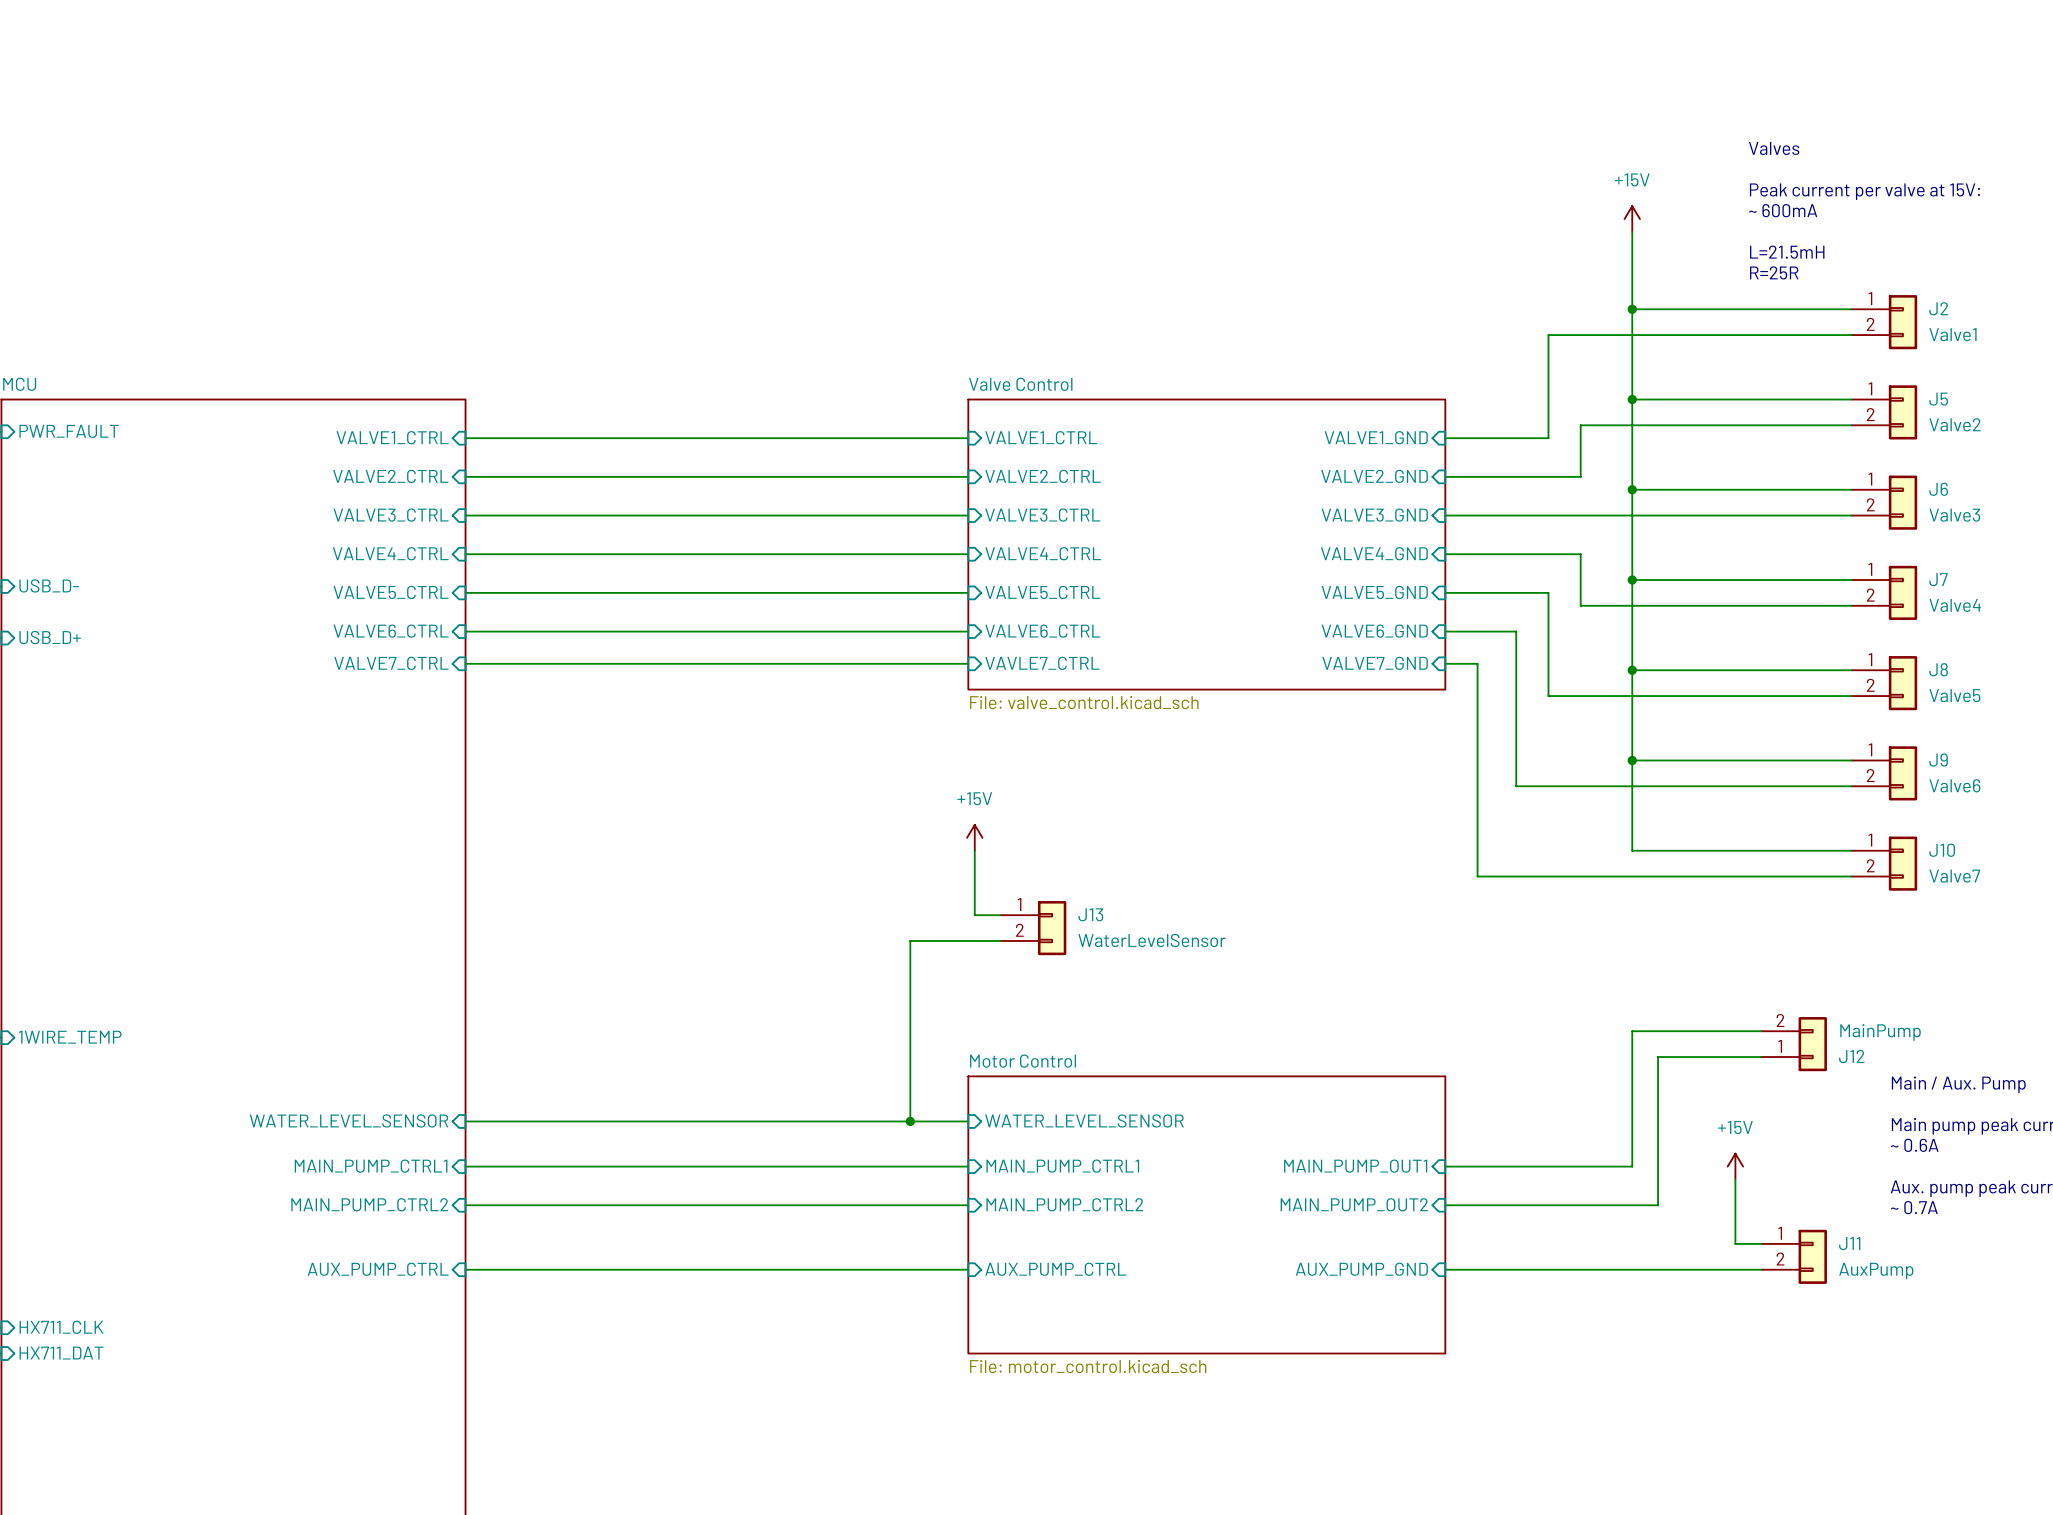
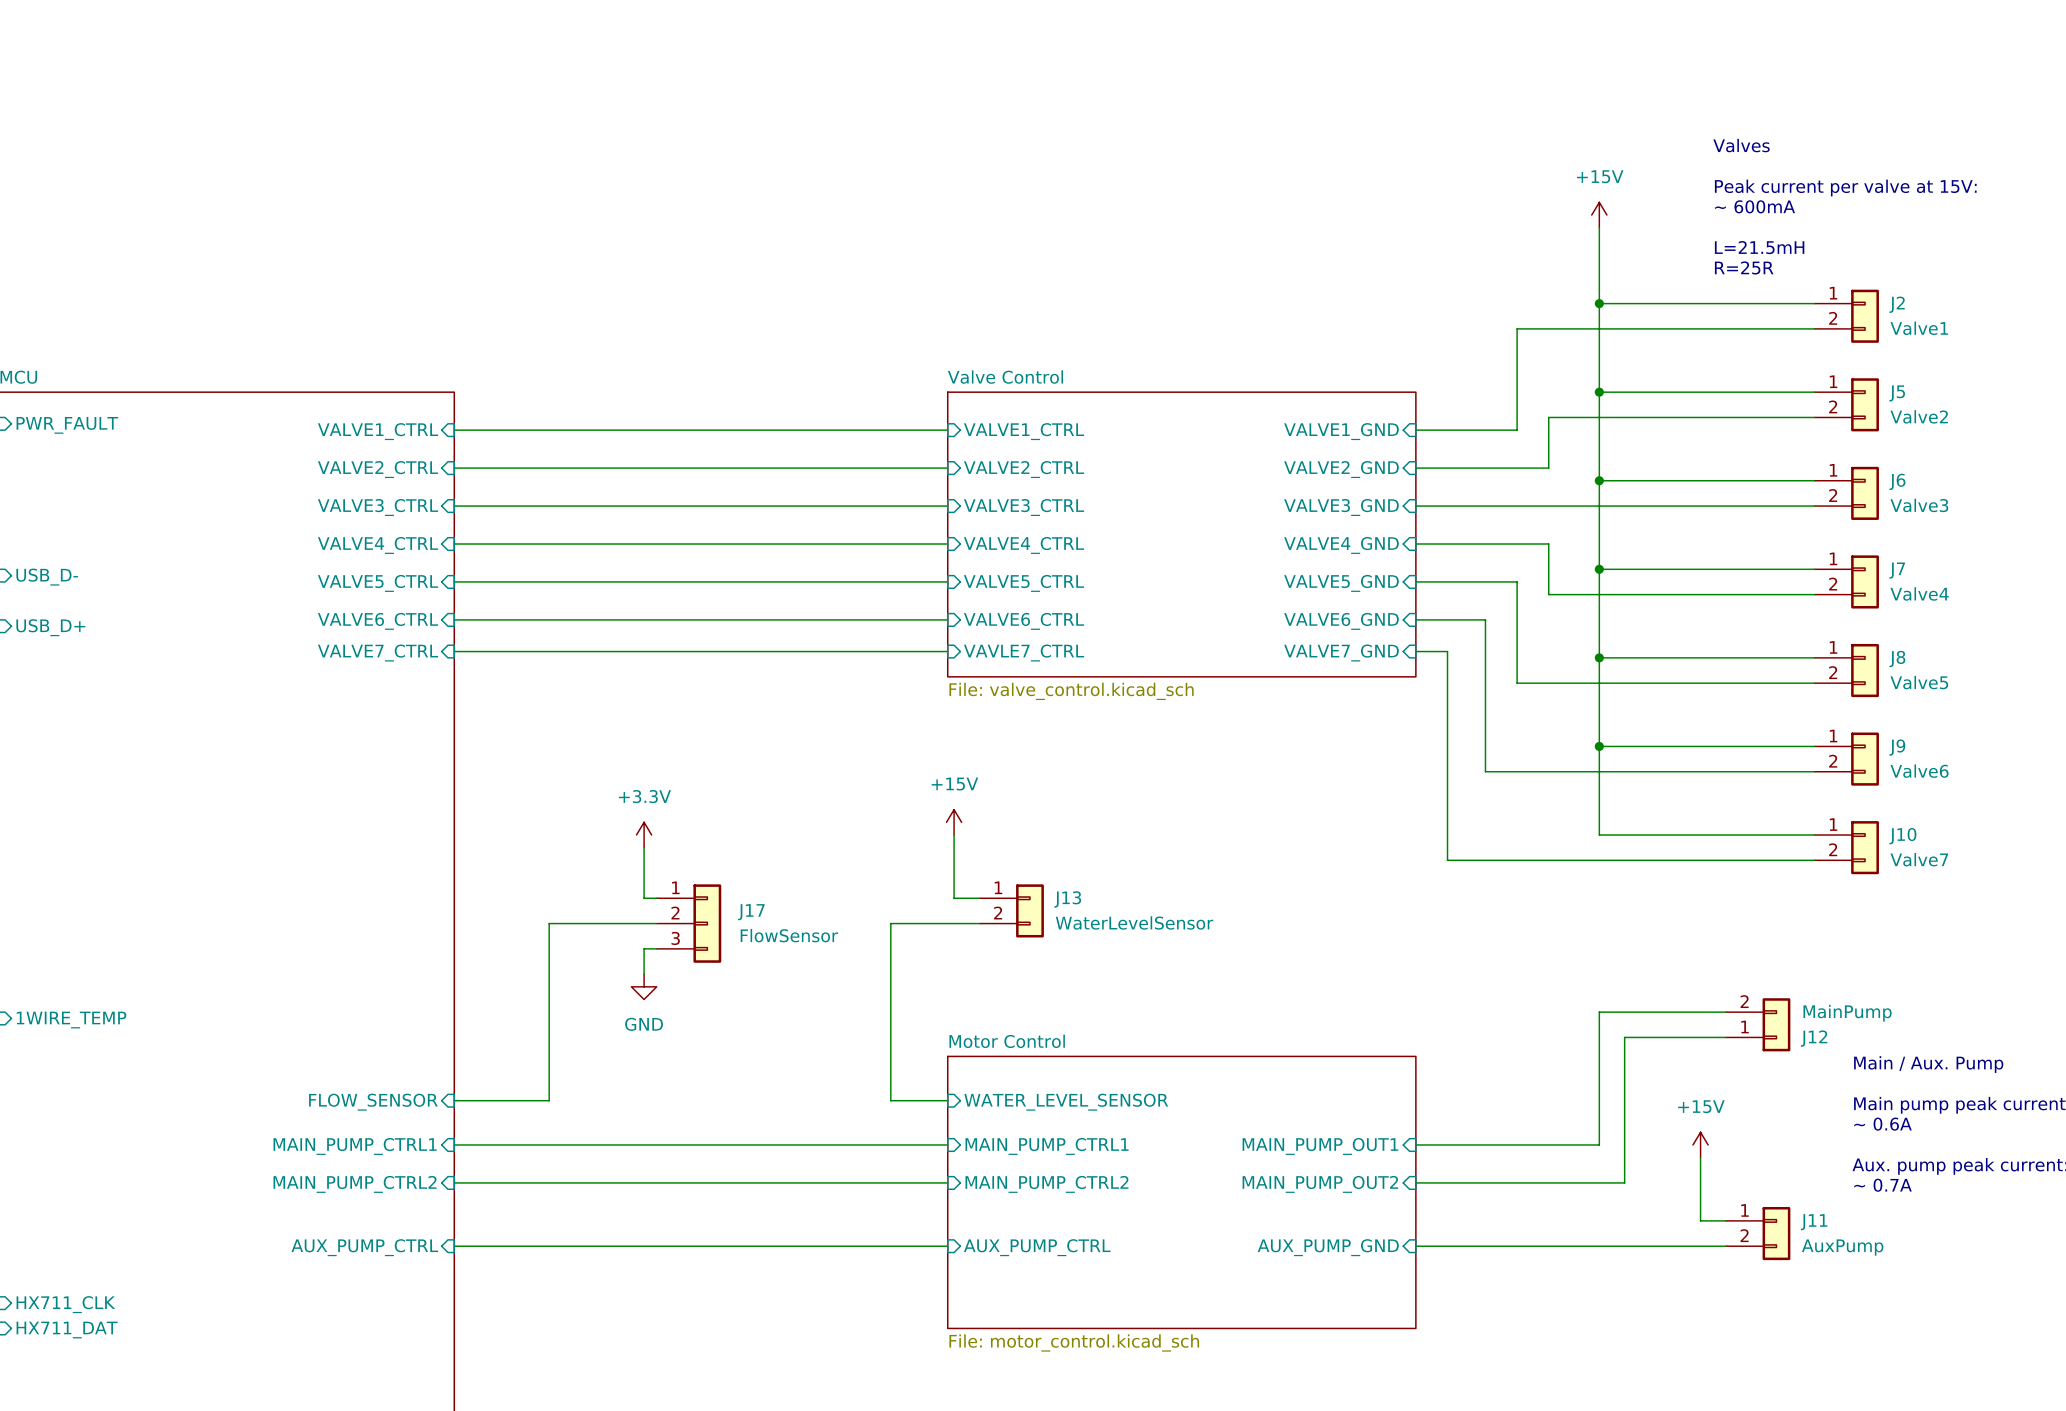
power symbol: none -> +3.3V (644, 835)
wire: none -> (644, 847) (644, 898) (656, 898)
J17: none -> FlowSensor (688, 923)
wire: none -> (656, 948) (644, 948) (644, 974)
power symbol: none -> GND (644, 986)
sheet pin: WATER_LEVEL_SENSOR (348, 1120) -> FLOW_SENSOR (373, 1102)
wire: (562, 1121) (910, 1121) -> (549, 1100) (549, 923) (656, 923)
junction: (910, 1121) -> none

